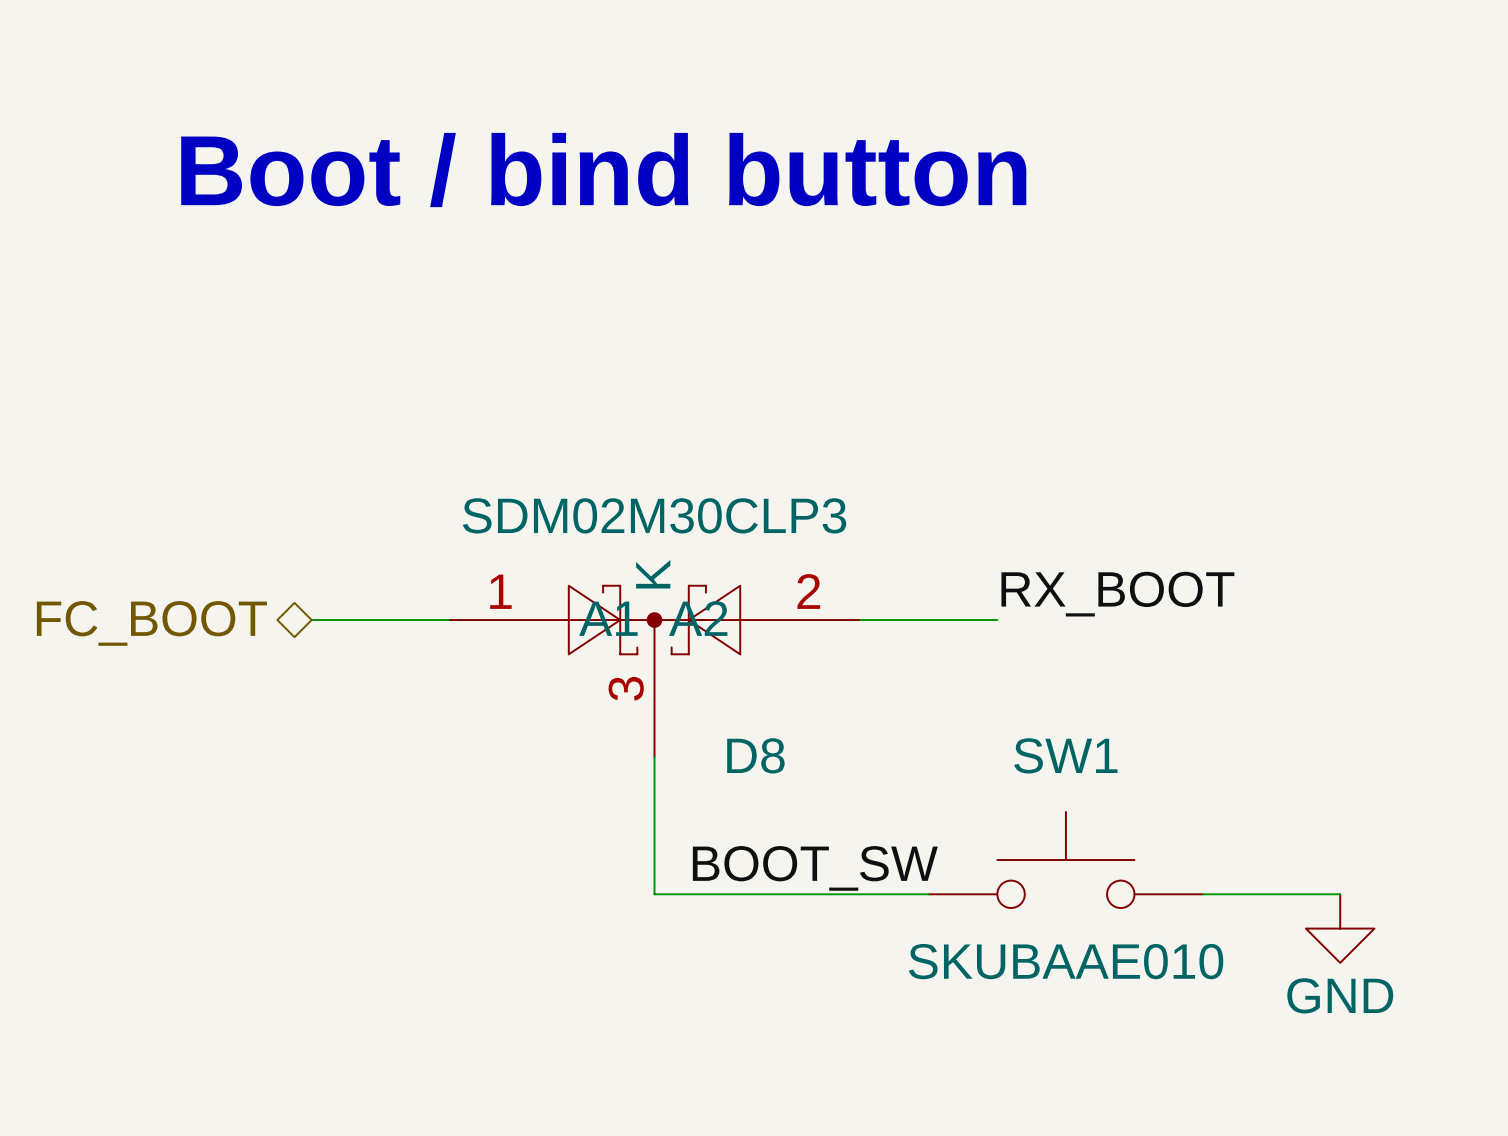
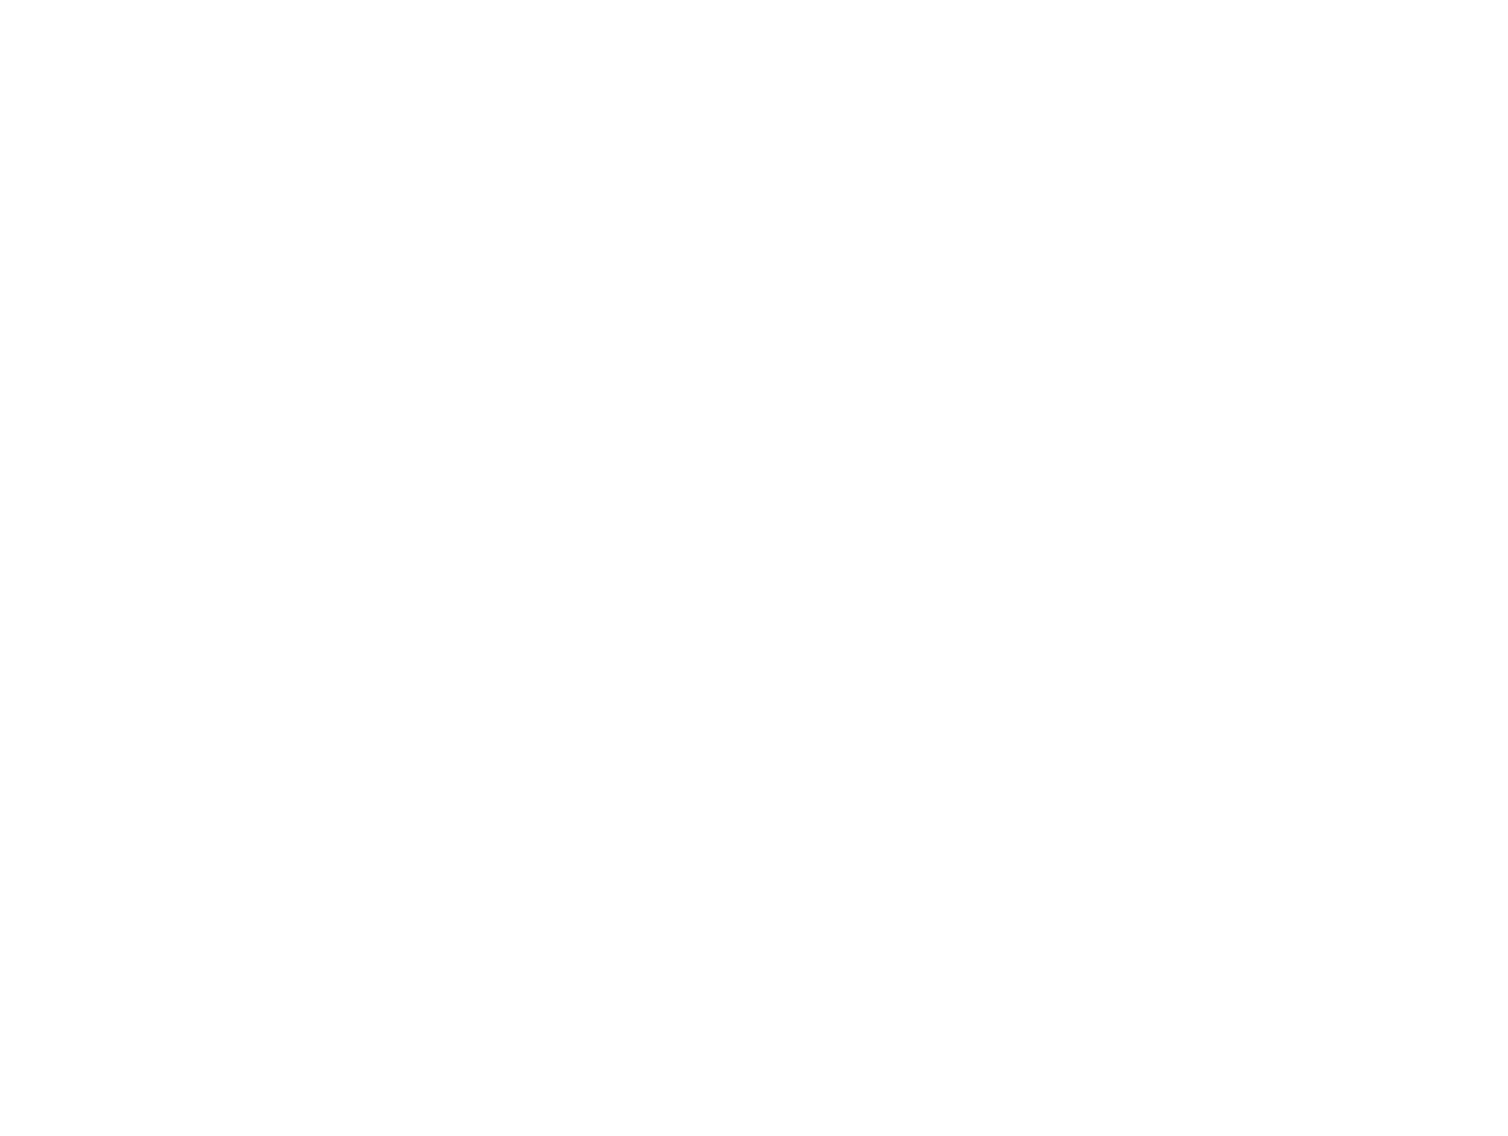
text: Boot / bind button (603, 170) -> none
label: RX_BOOT (1117, 594) -> none
wire: (311, 620) (448, 620) -> none
wire: (860, 620) (997, 620) -> none
hierarchical label: FC_BOOT (151, 623) -> none
D8: SDM02M30CLP3 (654, 671) -> none
wire: (654, 757) (654, 894) (928, 894) -> none
SW1: SKUBAAE010 (1065, 860) -> none
label: BOOT_SW (815, 868) -> none
wire: (1203, 894) (1340, 894) -> none
power symbol: GND (1340, 928) -> none

